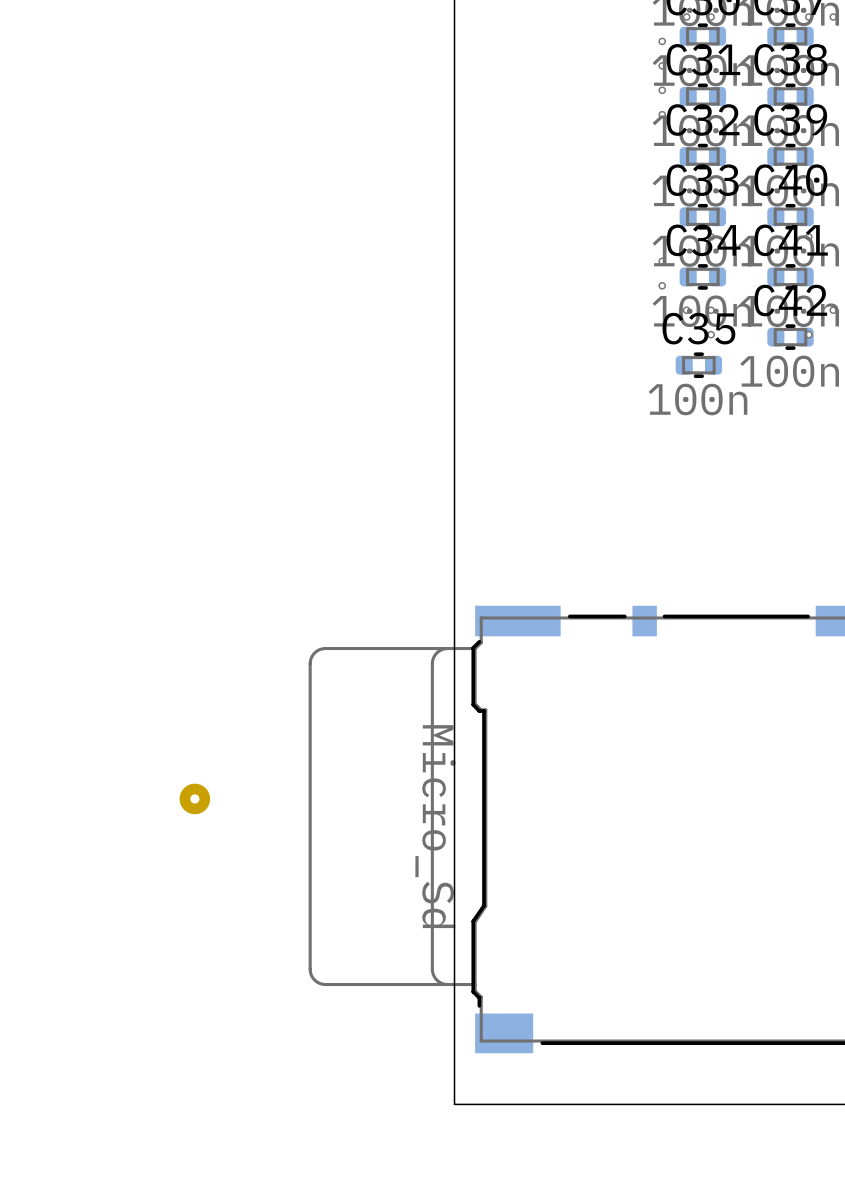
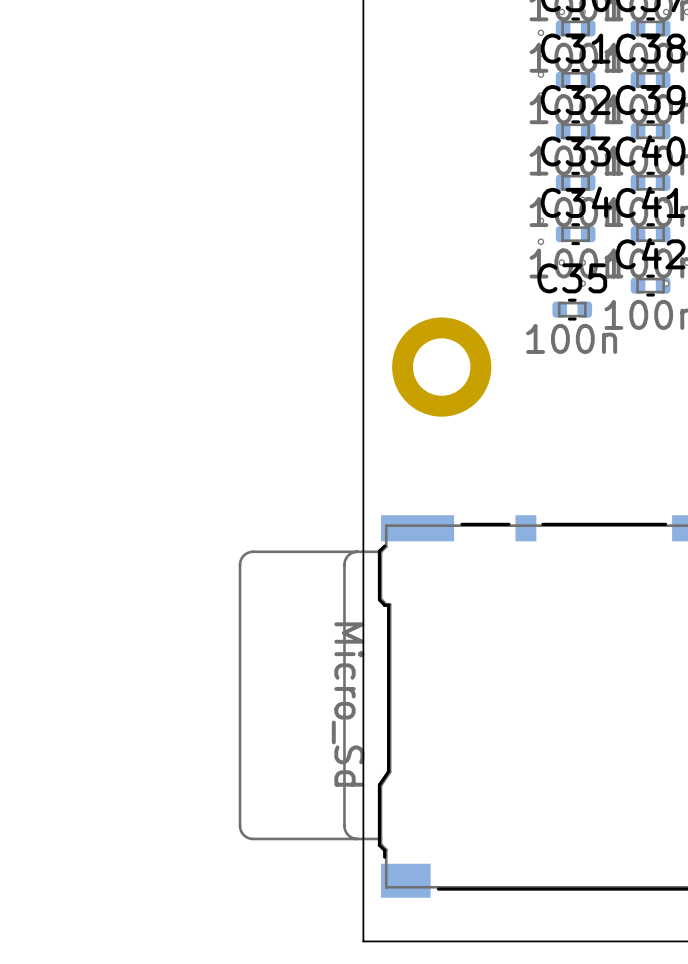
part: none -> (441, 367)
part: (194, 798) -> none

